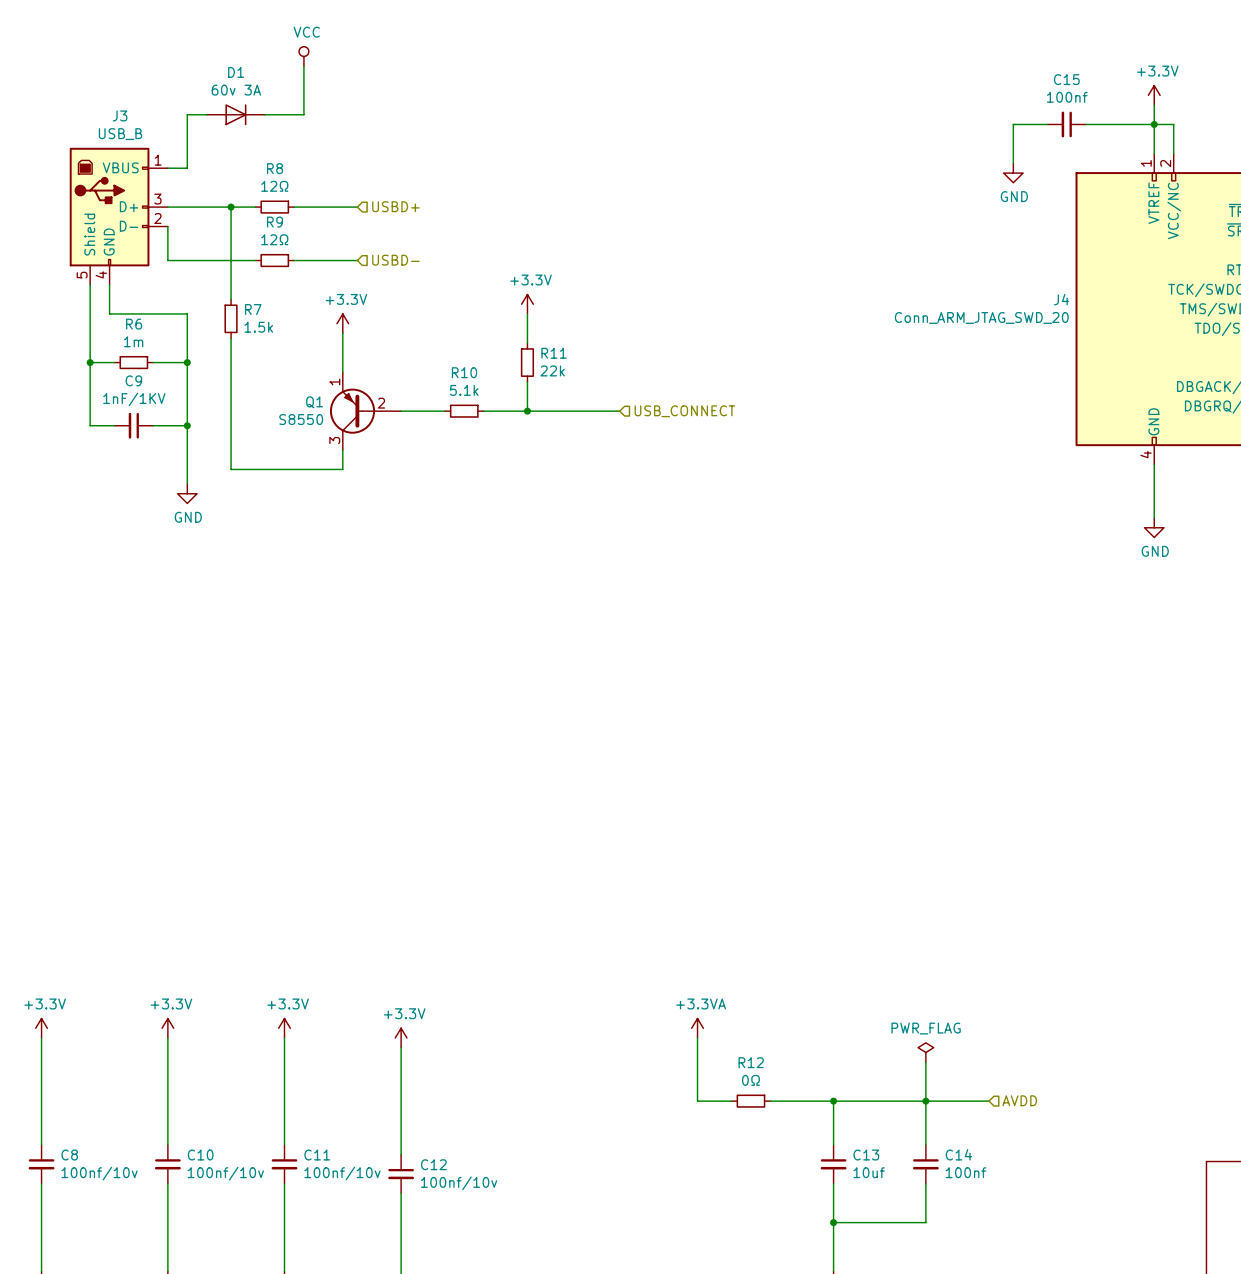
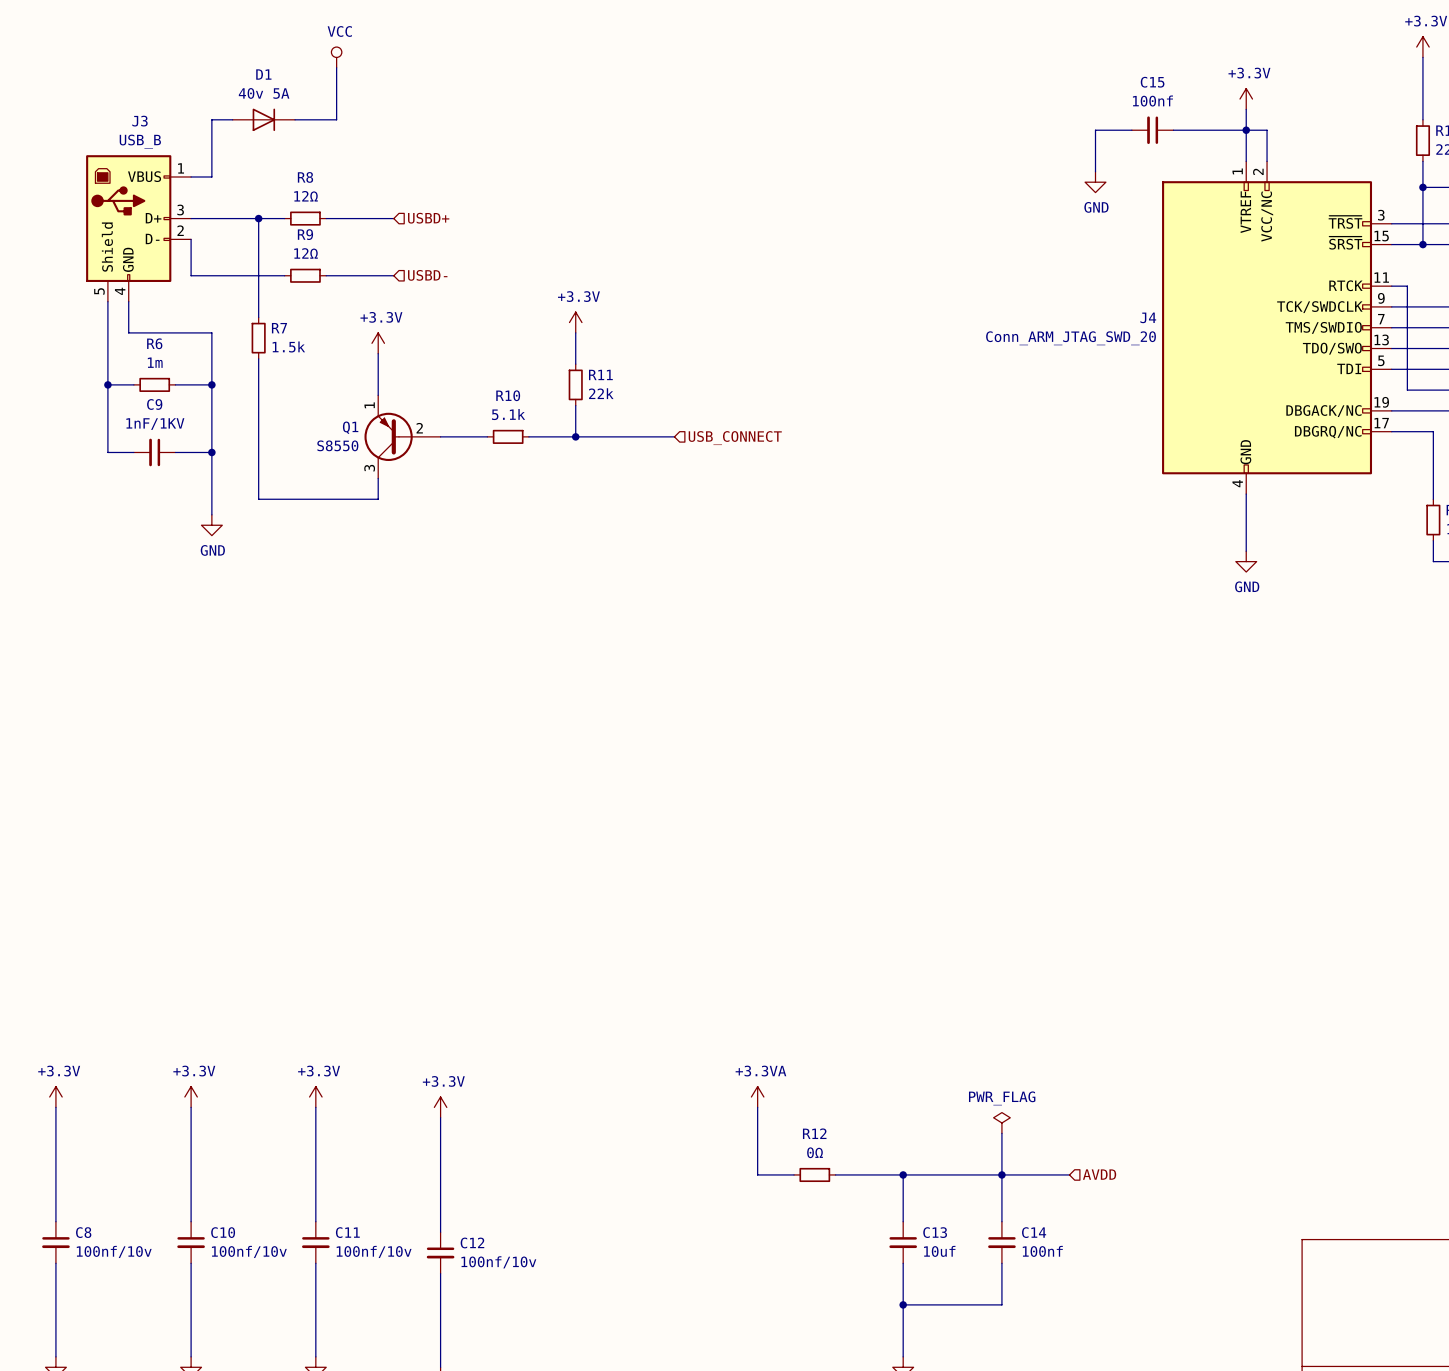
D1 value: 60v 3A (236, 90) -> 40v 5A (264, 93)

